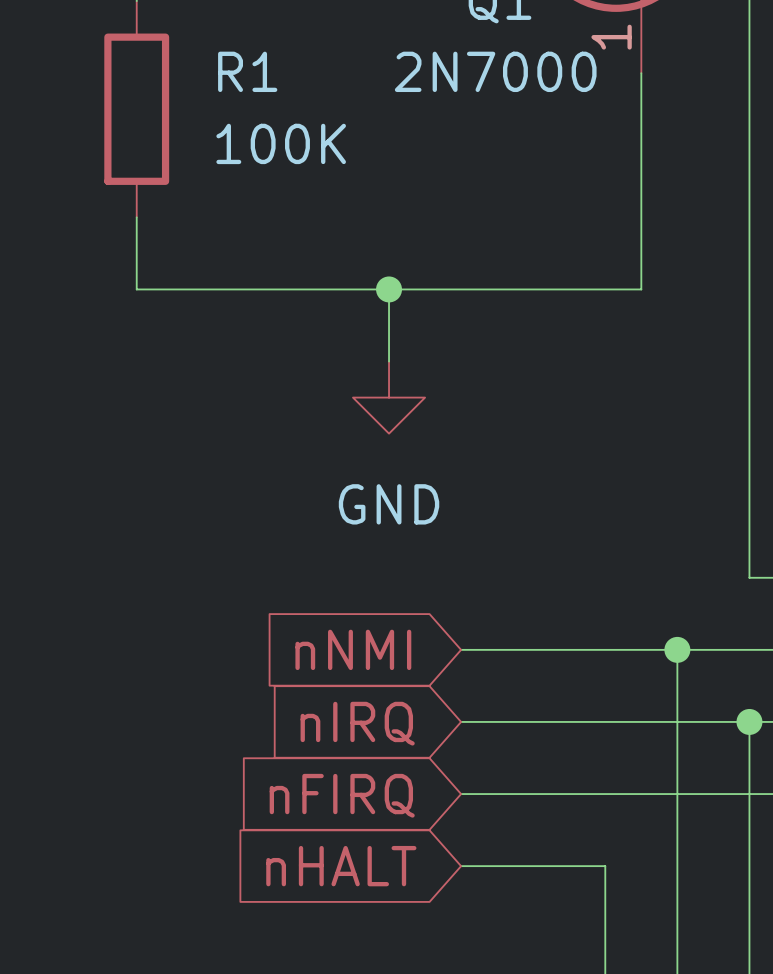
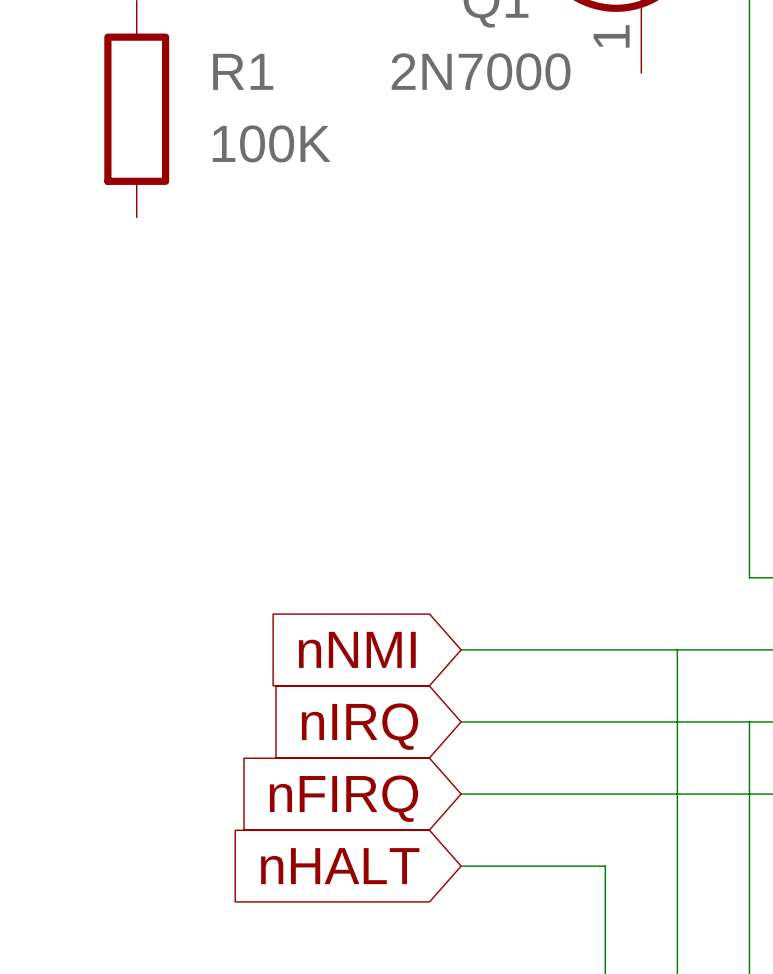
wire: (641, 73) (641, 289) (136, 289) (136, 217) -> none
wire: (389, 289) (389, 361) -> none
junction: (389, 289) -> none
power symbol: GND (389, 397) -> none
junction: (677, 649) -> none
junction: (749, 721) -> none

